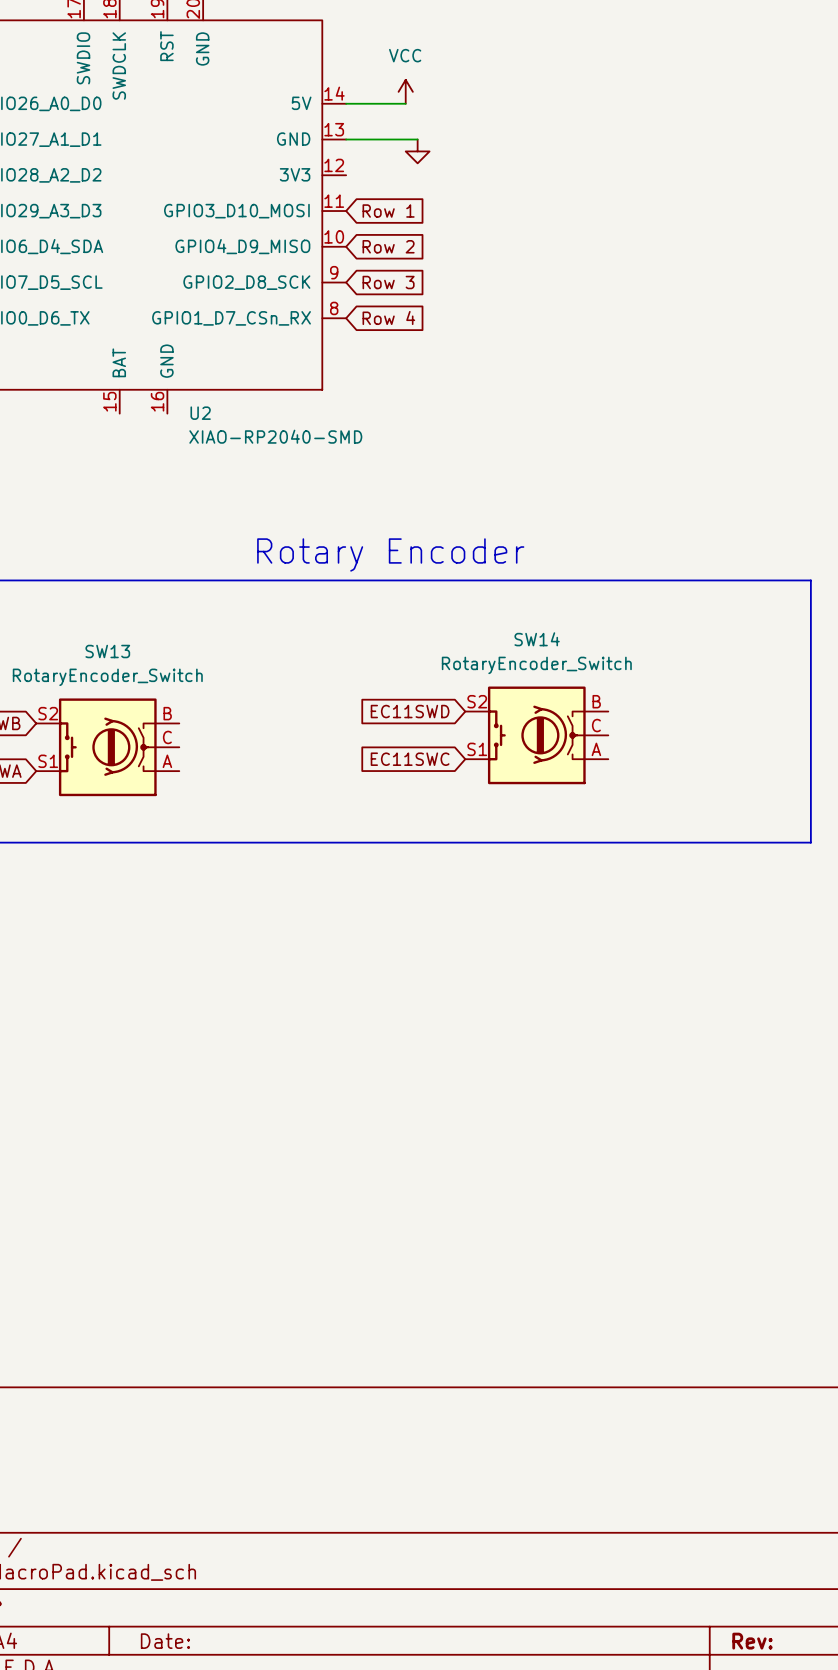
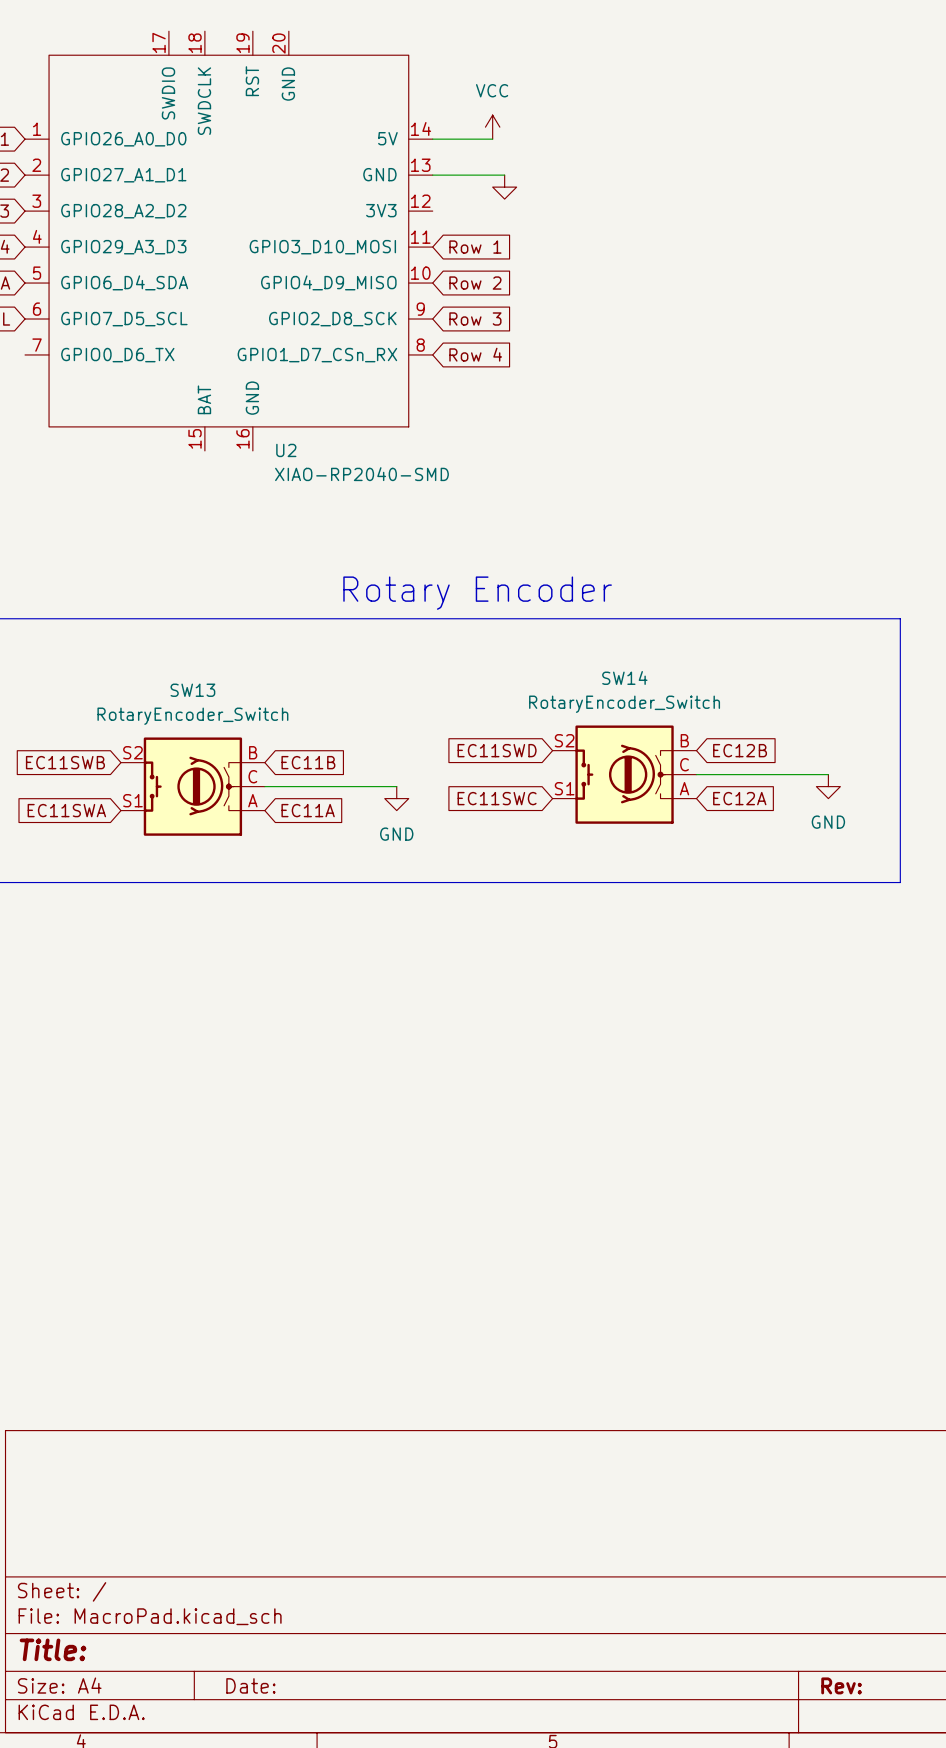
global label: none -> EC12B (740, 750)
global label: none -> EC11B (308, 762)
wire: none -> (696, 774) (828, 774)
wire: none -> (264, 786) (396, 786)
power symbol: none -> GND (828, 786)
power symbol: none -> GND (396, 798)
global label: none -> EC12A (739, 798)
global label: none -> EC11A (308, 810)

